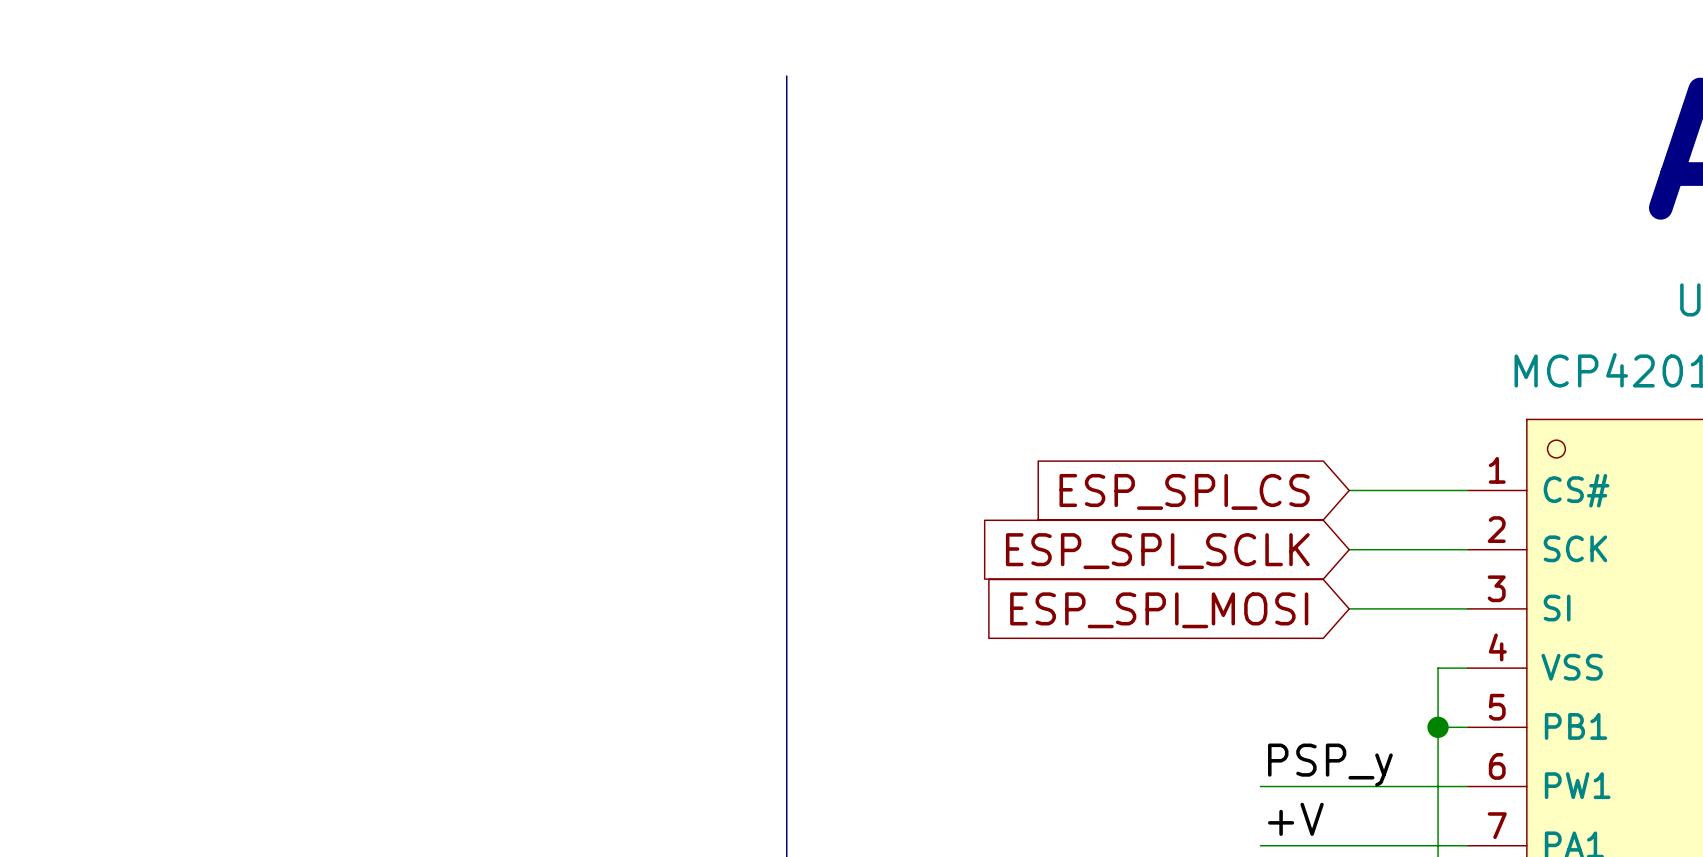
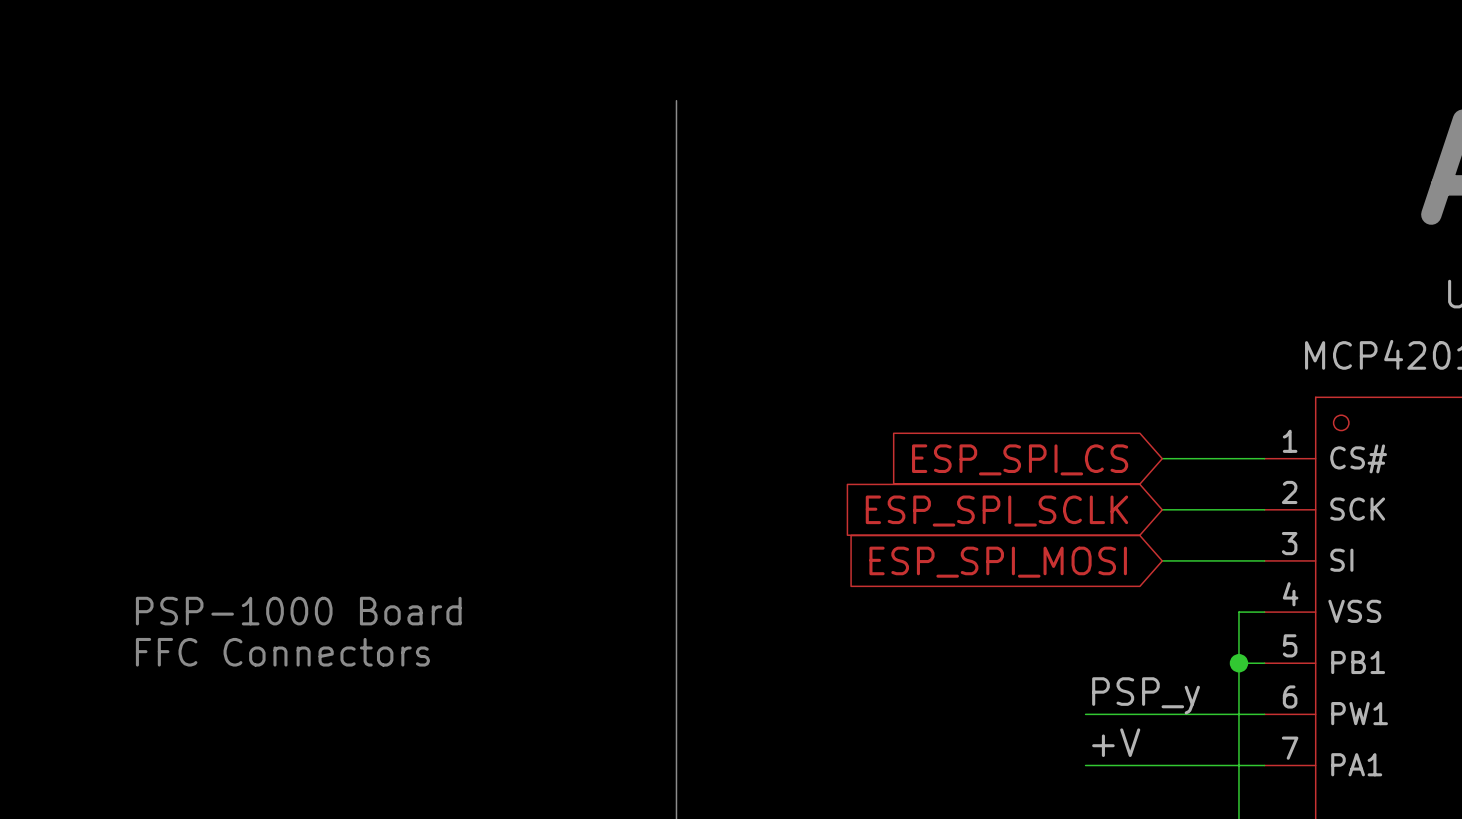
text: none -> PSP-1000 Board (298, 611)
text: none -> FFC Connectors (282, 652)

